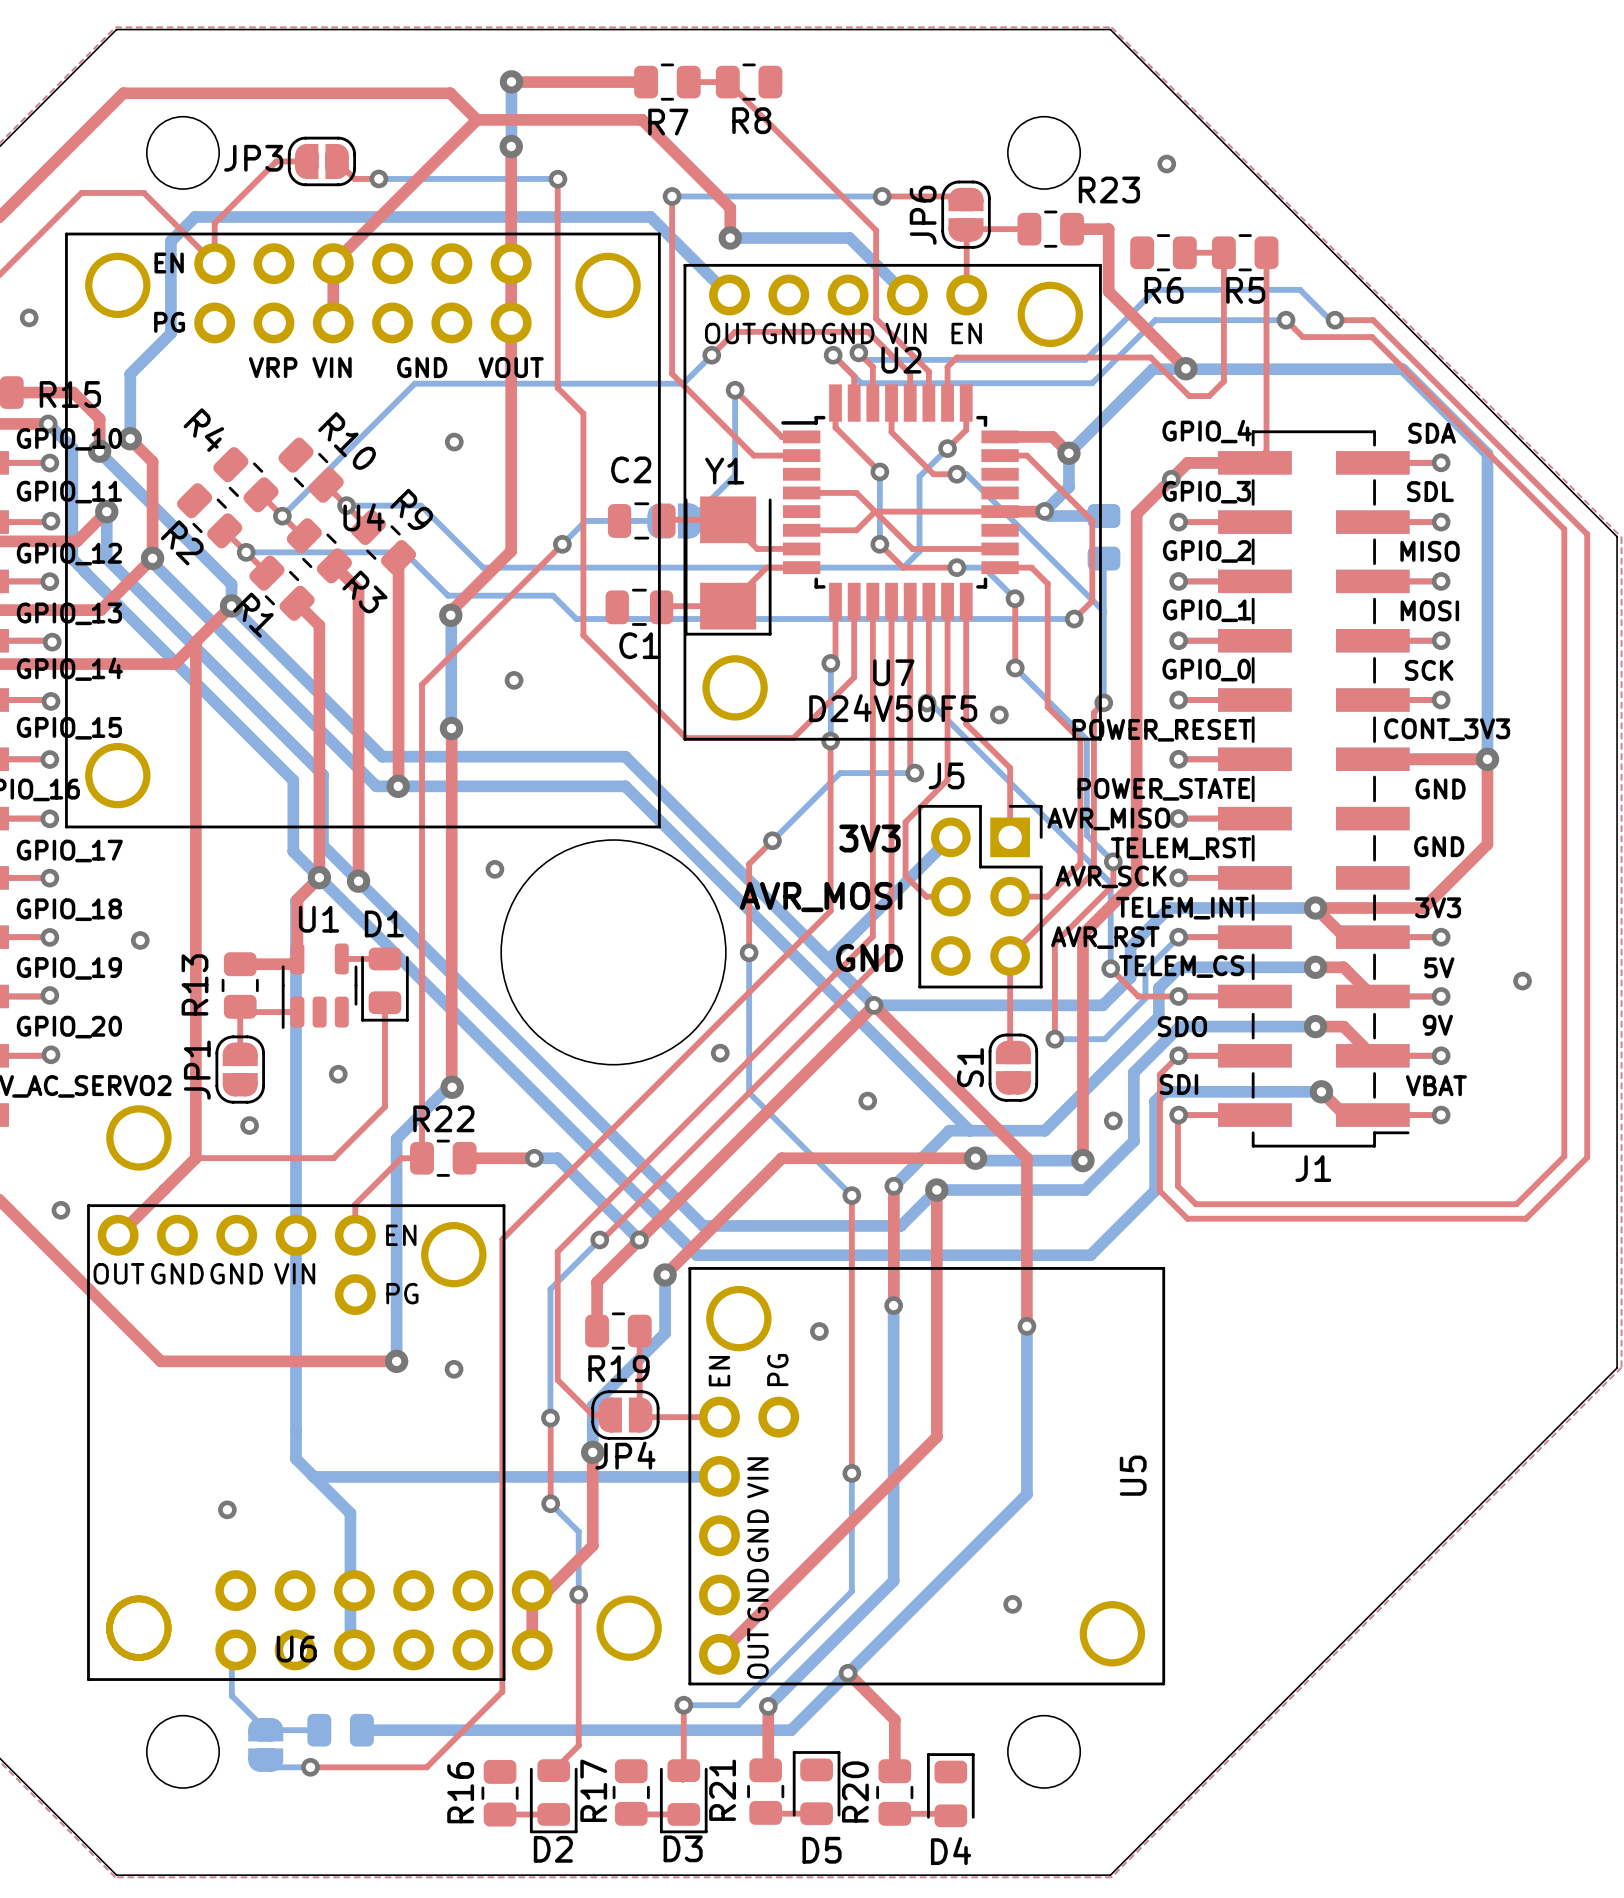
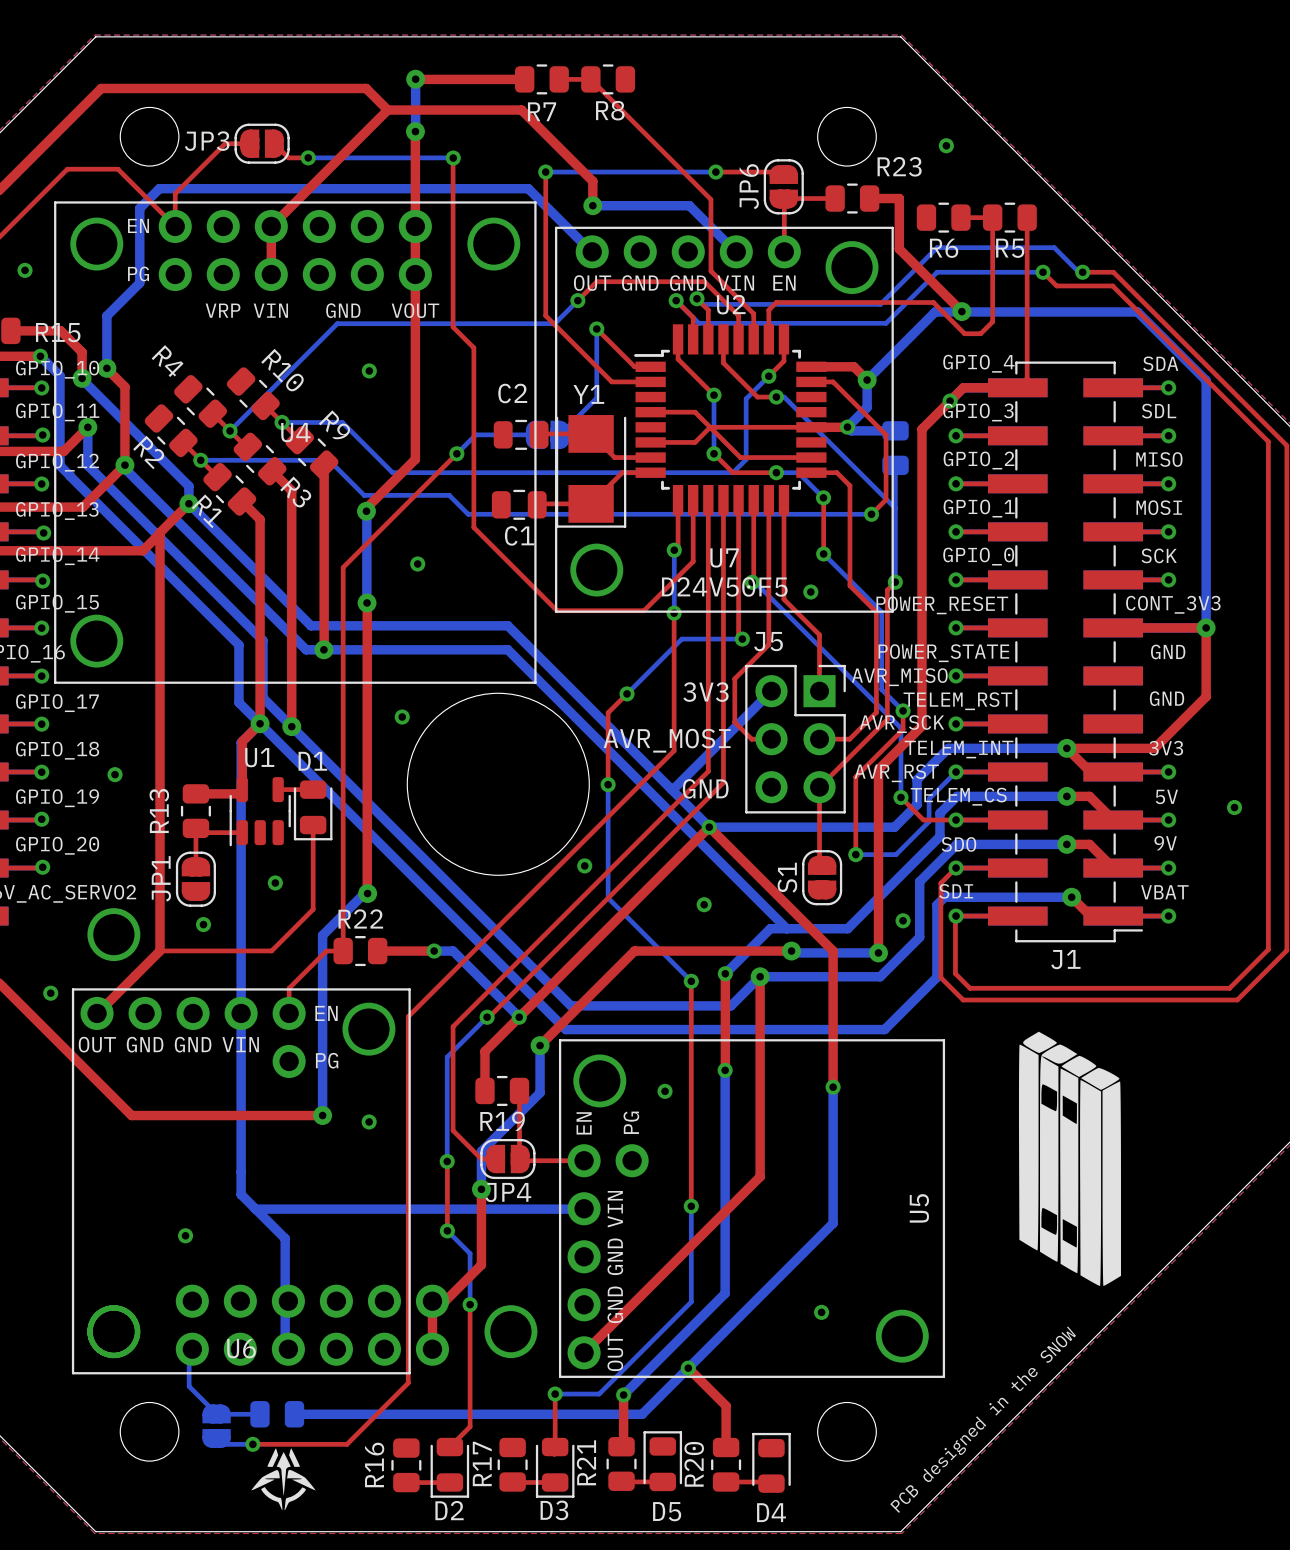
drawing: none -> [1018, 1031, 1121, 1287]
text: none -> PCB designed in the SNOW (983, 1419)
drawing: none -> [251, 1448, 316, 1511]

